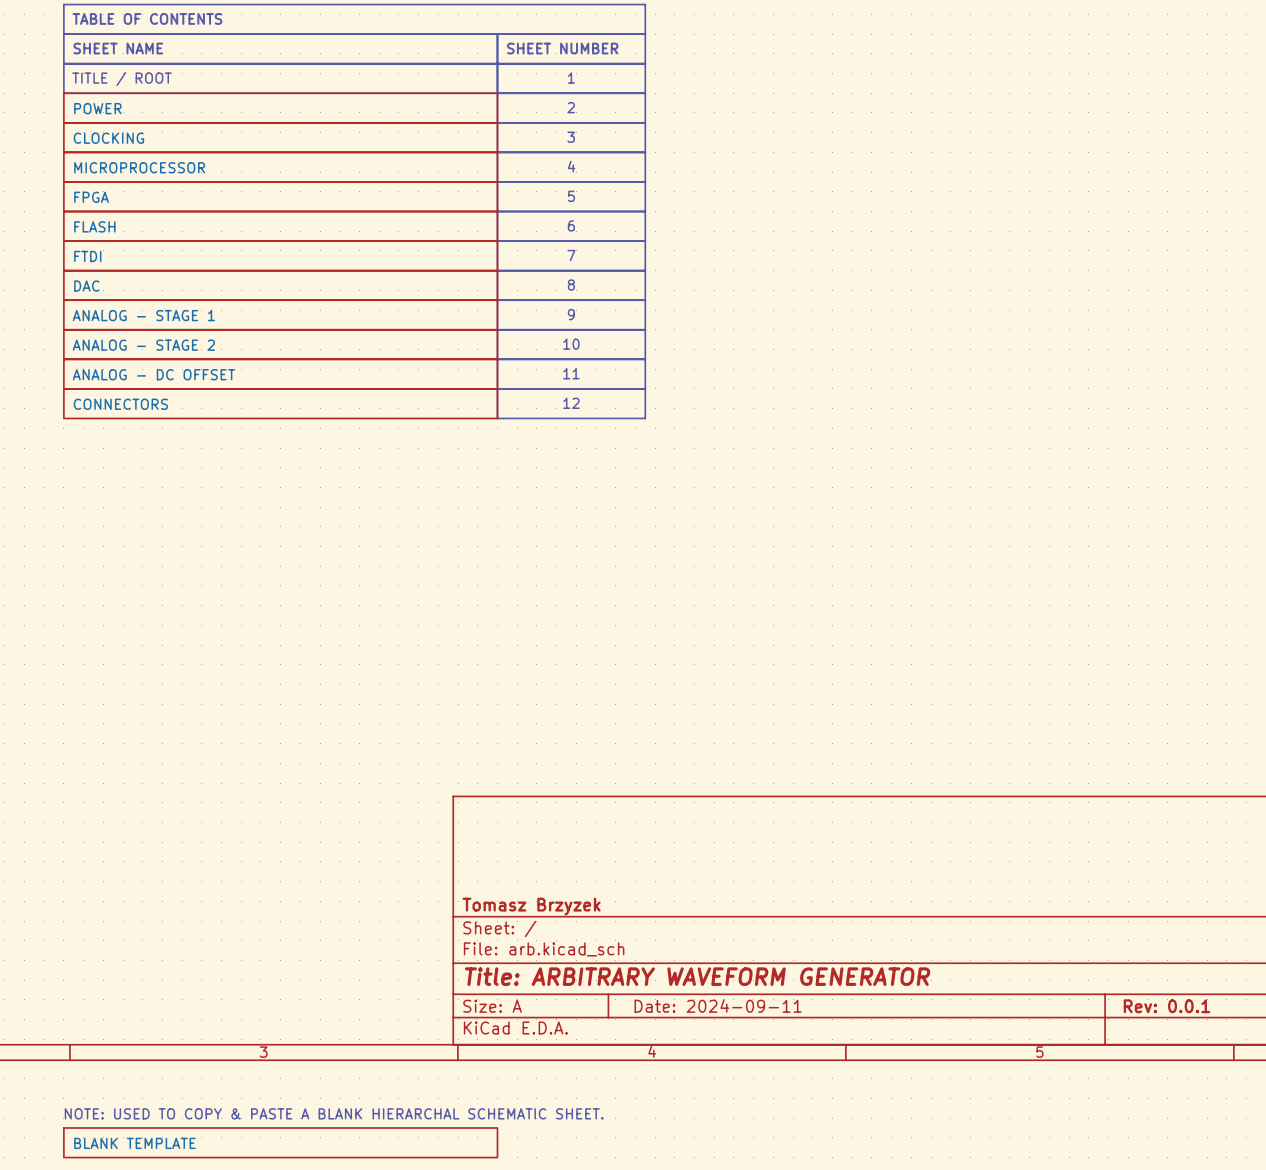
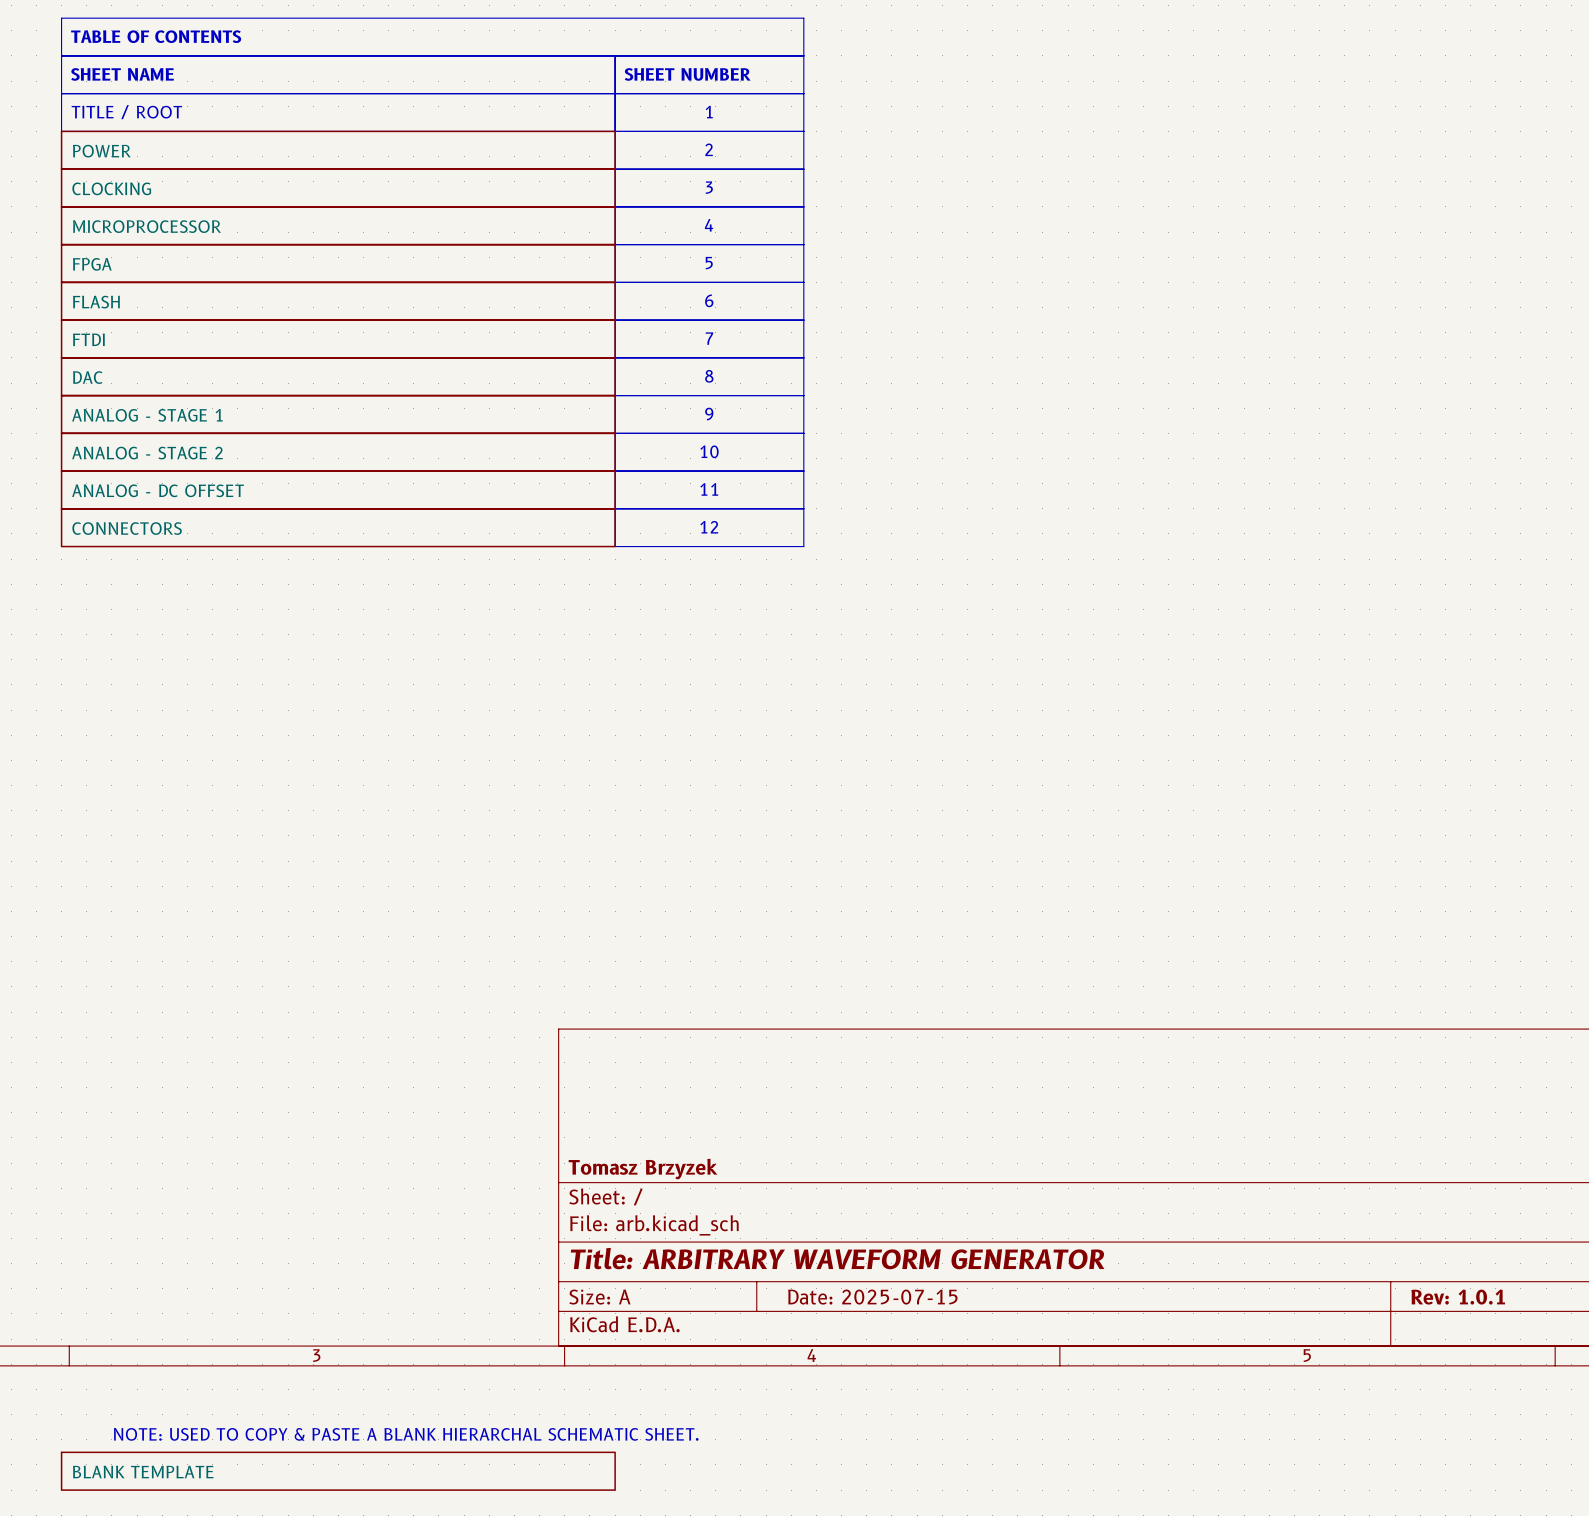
title block: Date: 2024-09-11 (718, 1005) -> Date: 2025-07-15 (872, 1297)
title block: Rev: 0.0.1 (1167, 1006) -> Rev: 1.0.1 (1458, 1297)

